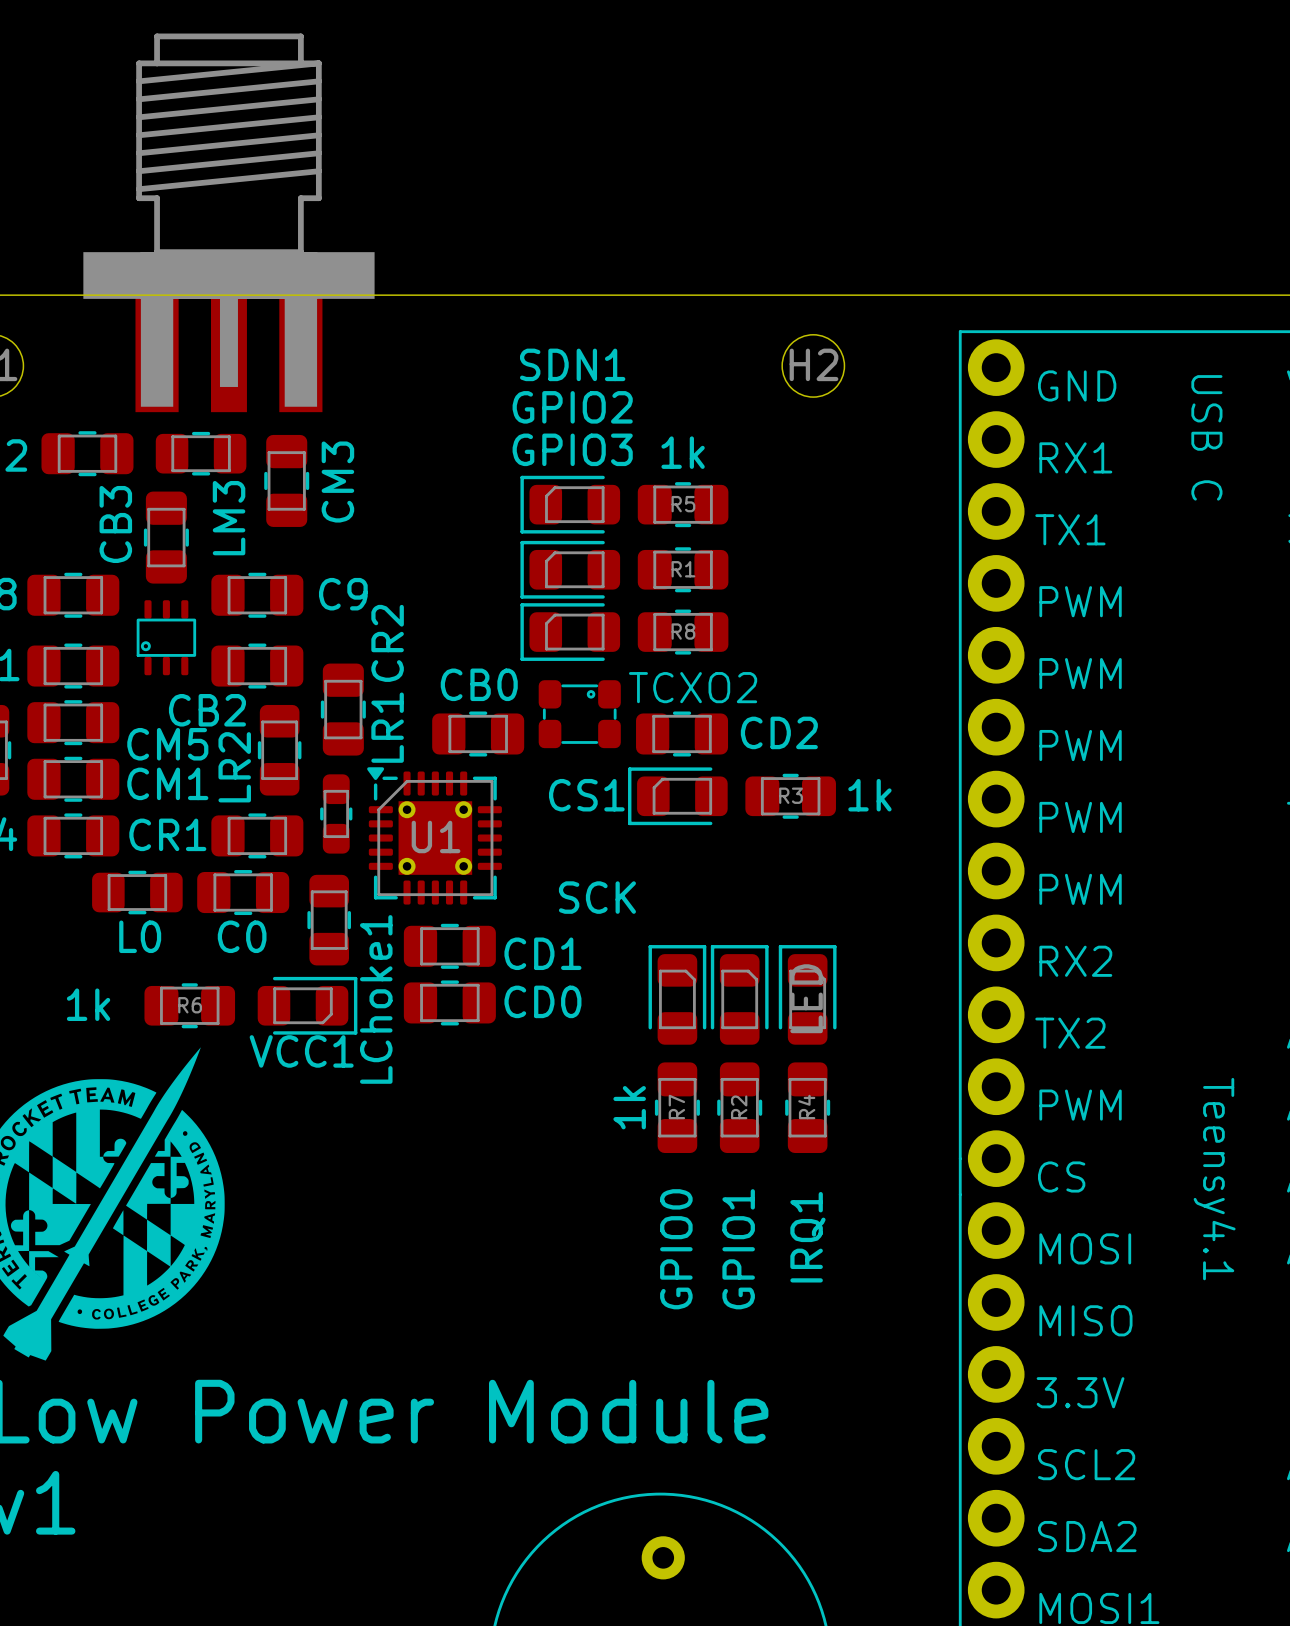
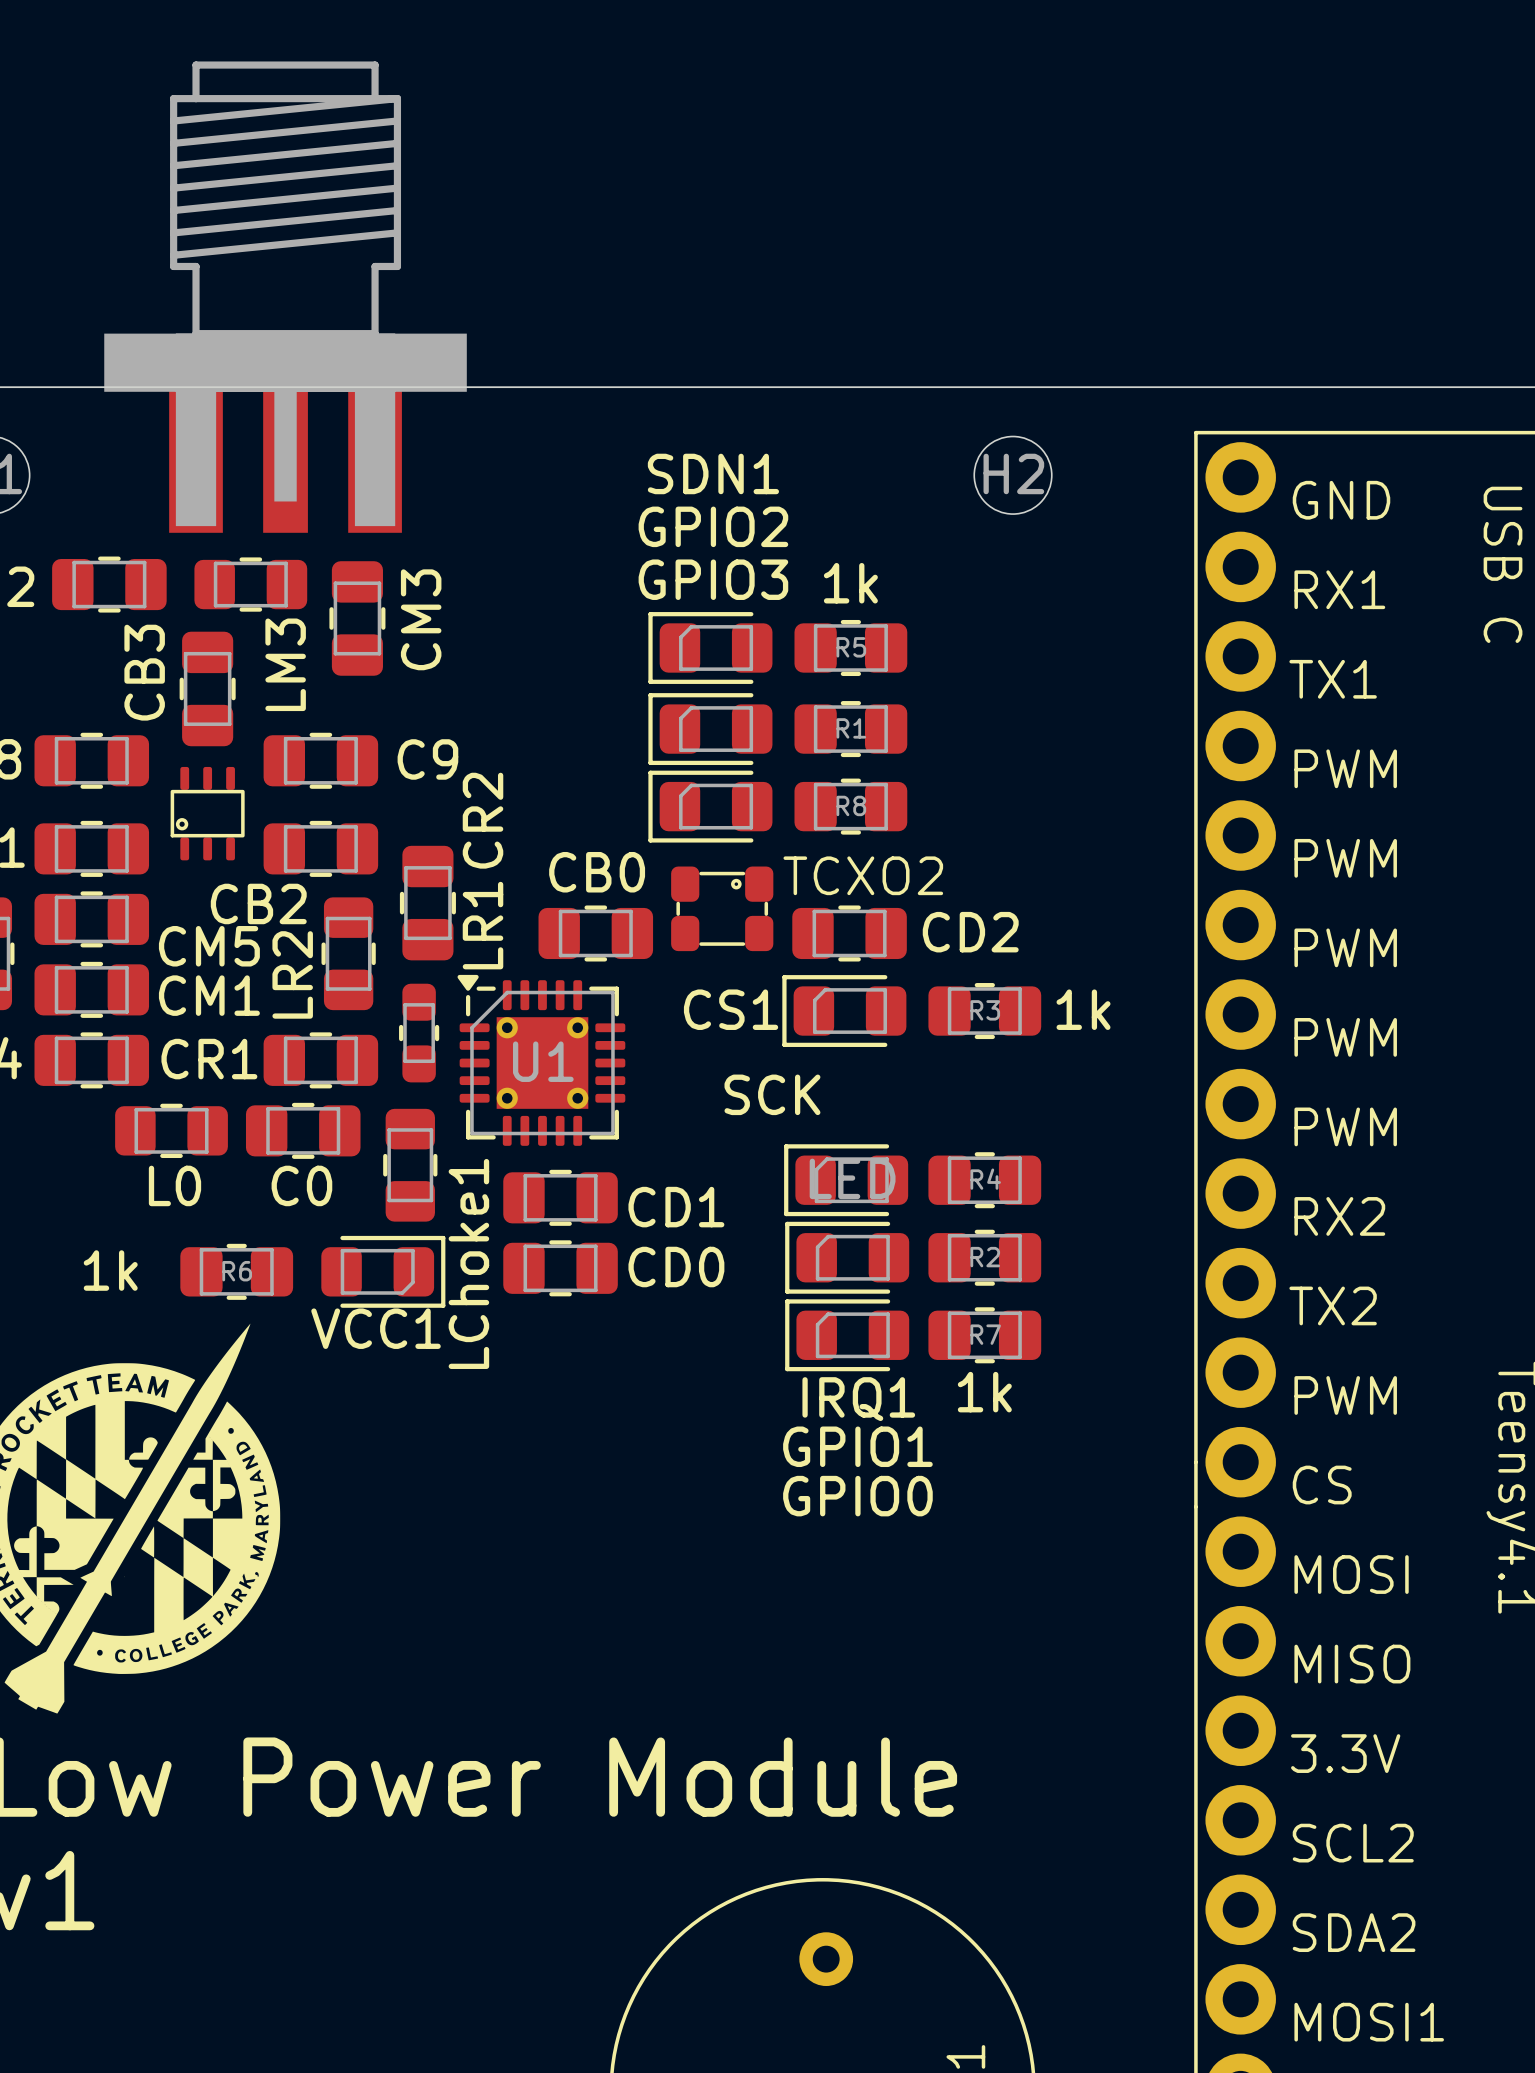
text position: SCK (597, 897) -> SCK (772, 1094)
GPIO0 rotation: 0° (677, 994) -> 90° counterclockwise (847, 1335)
GPIO0 position: (677, 994) -> (847, 1335)
GPIO1 rotation: 0° (739, 994) -> 90° counterclockwise (847, 1257)
IRQ1 rotation: 0° (807, 994) -> 90° counterclockwise (846, 1180)
IRQ1 position: (807, 994) -> (846, 1180)
R7 value position: 1k (629, 1107) -> 1k (984, 1392)
R7 rotation: 0° (677, 1107) -> 90° clockwise (984, 1335)
R7 position: (677, 1107) -> (984, 1335)
R2 rotation: 0° (739, 1107) -> 90° clockwise (984, 1257)
R2 position: (739, 1107) -> (984, 1257)
R4 rotation: 0° (807, 1107) -> 90° clockwise (984, 1180)
R4 position: (807, 1107) -> (984, 1180)
IRQ1 name position: IRQ1 (807, 1237) -> IRQ1 (858, 1399)
GPIO0 name position: GPIO0 (676, 1249) -> GPIO0 (857, 1496)
GPIO1 name position: GPIO1 (738, 1249) -> GPIO1 (857, 1446)

